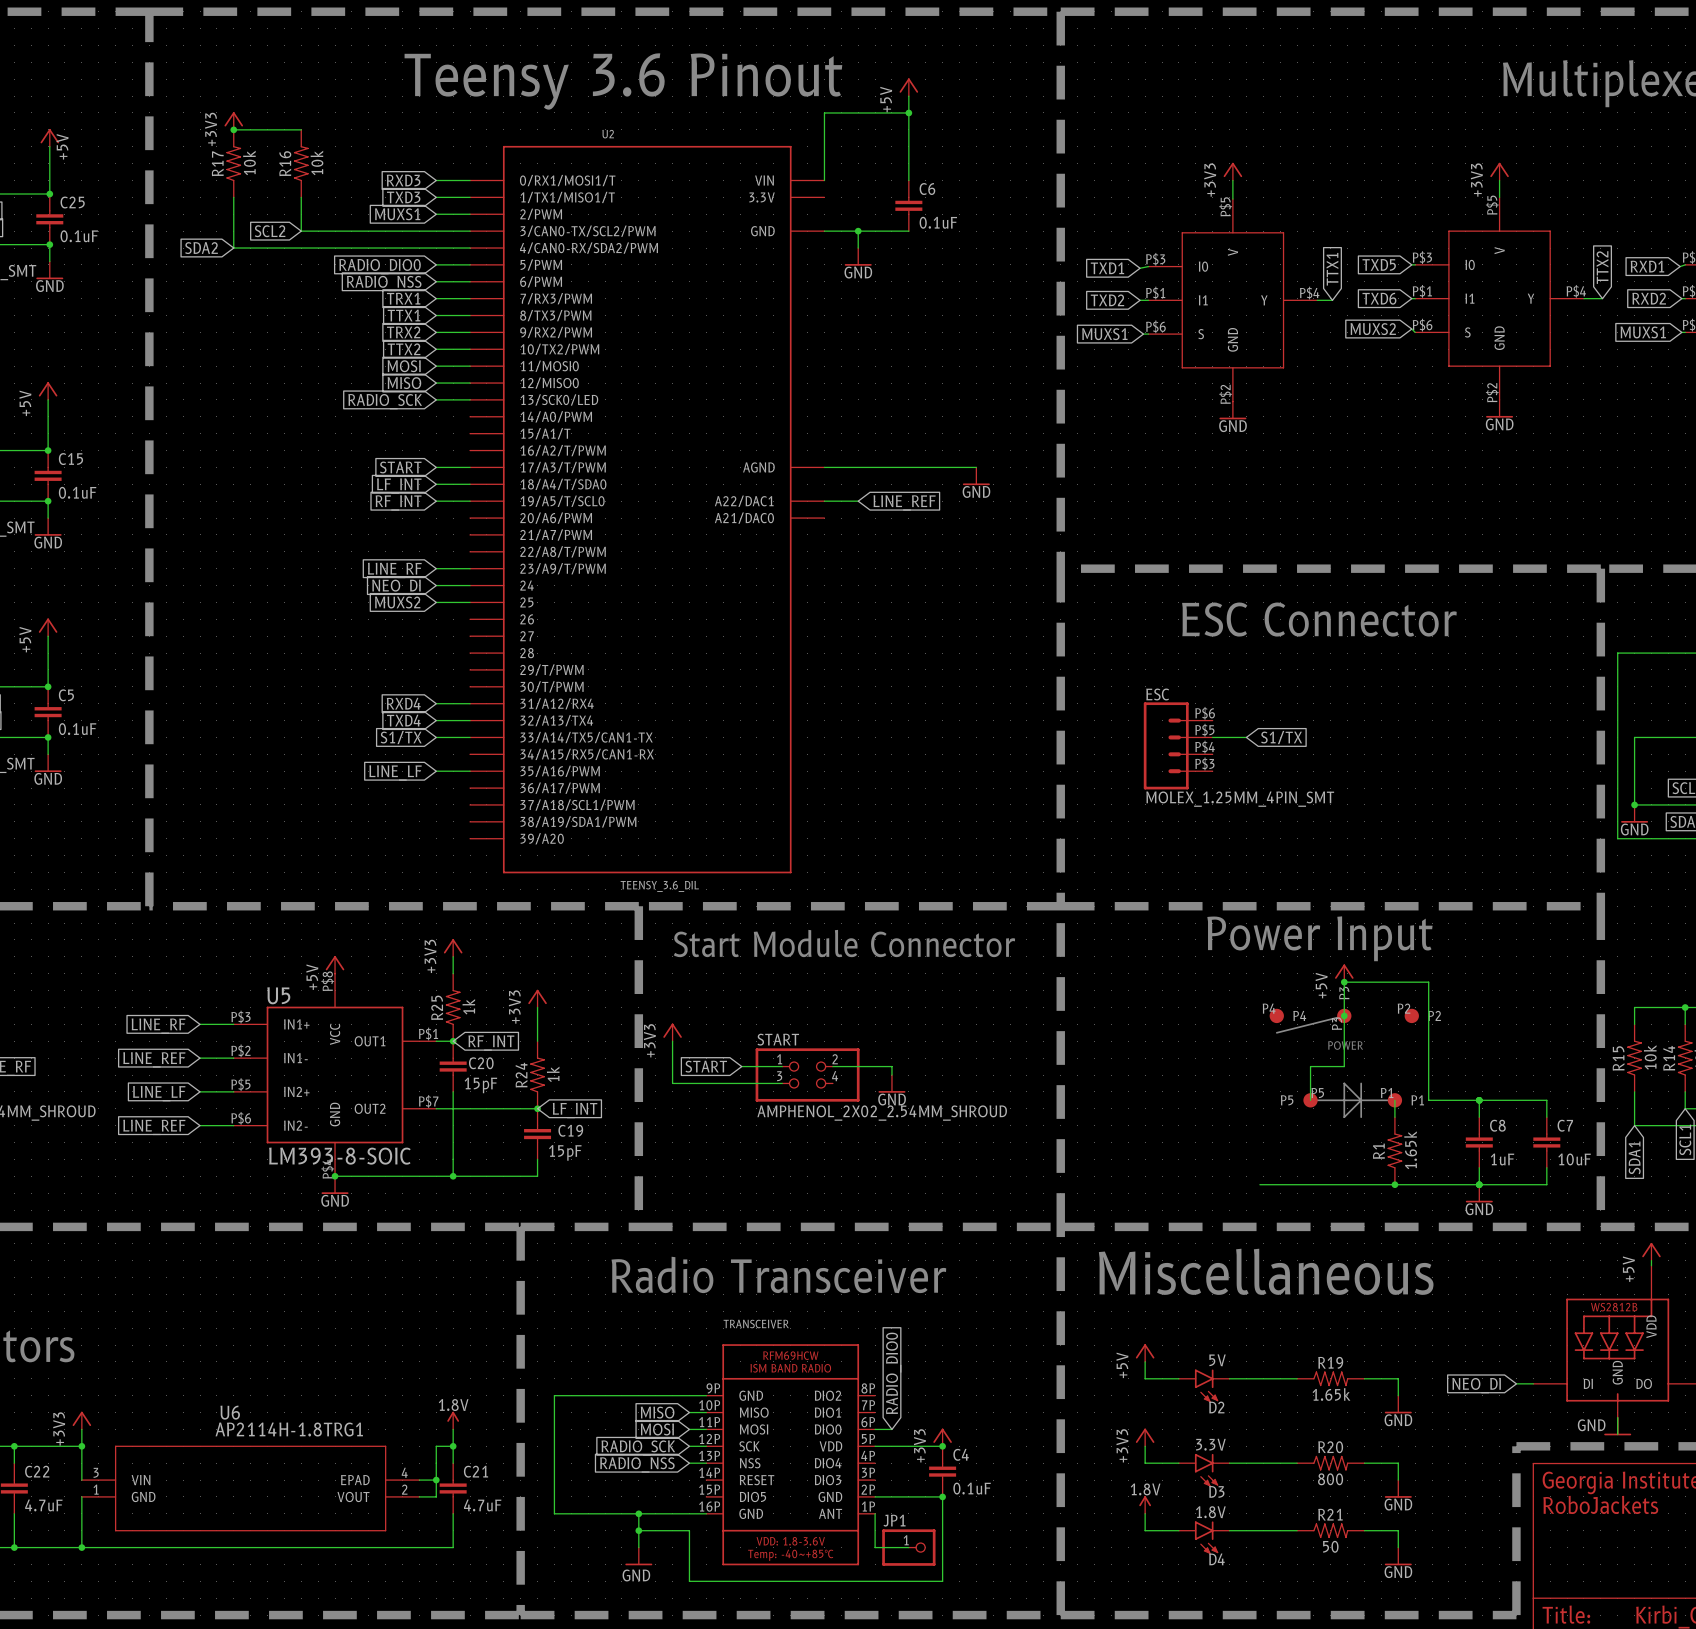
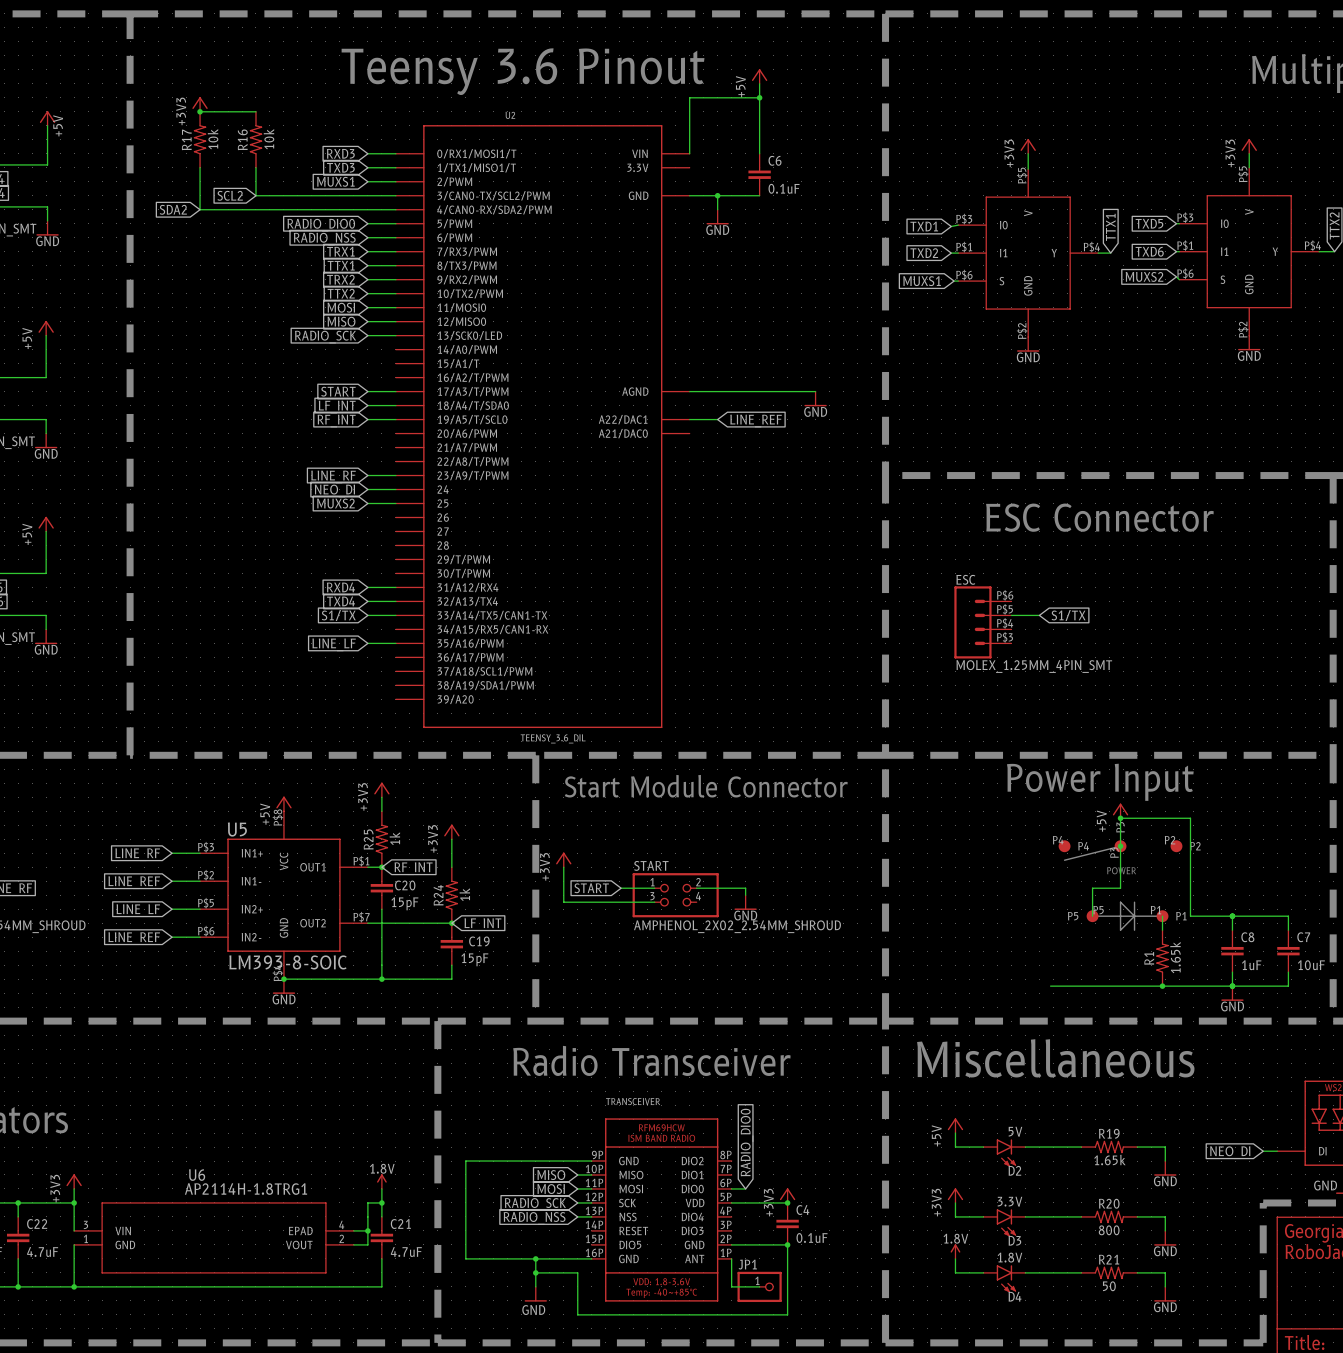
junction: (49, 194) -> none
C25: 0.1uF (49, 219) -> none
junction: (49, 244) -> none
junction: (48, 450) -> none
C15: 0.1uF (48, 475) -> none
junction: (48, 501) -> none
junction: (48, 686) -> none
C5: 0.1uF (48, 712) -> none
junction: (48, 737) -> none

